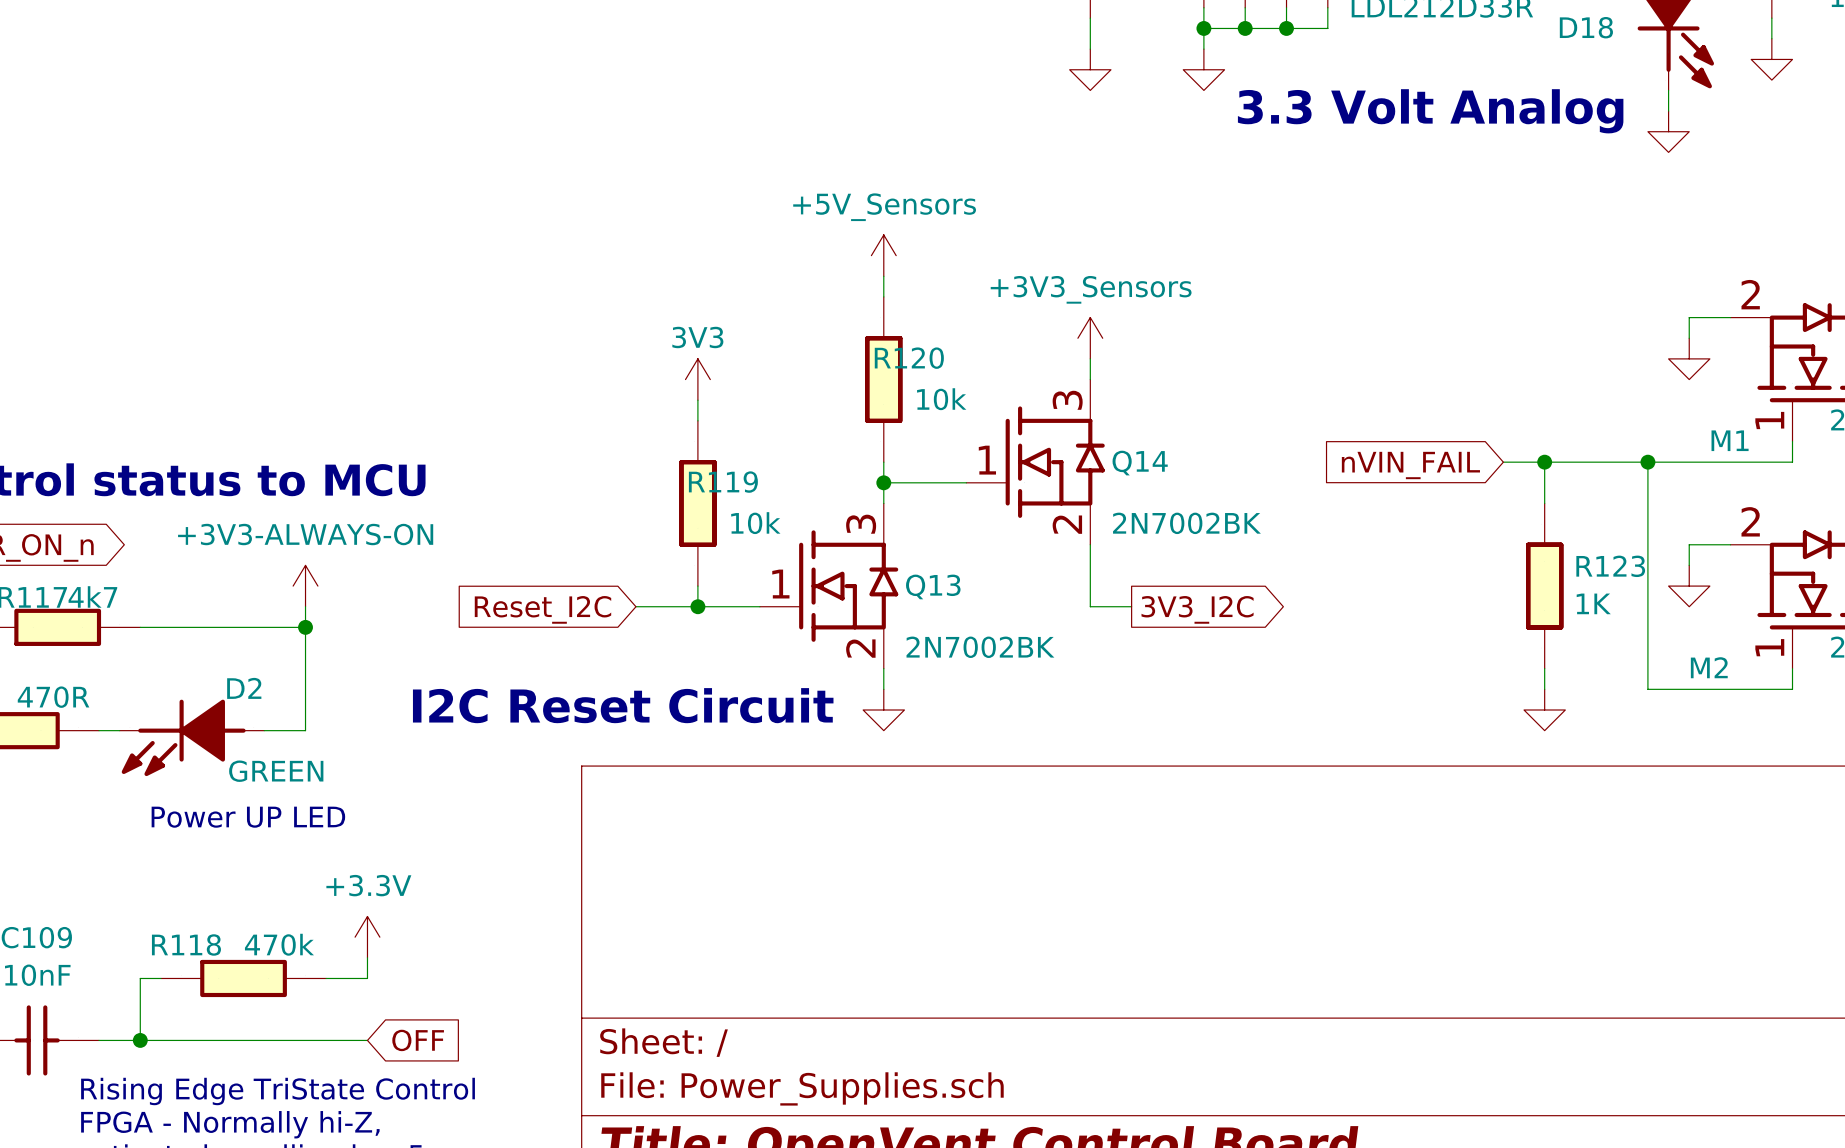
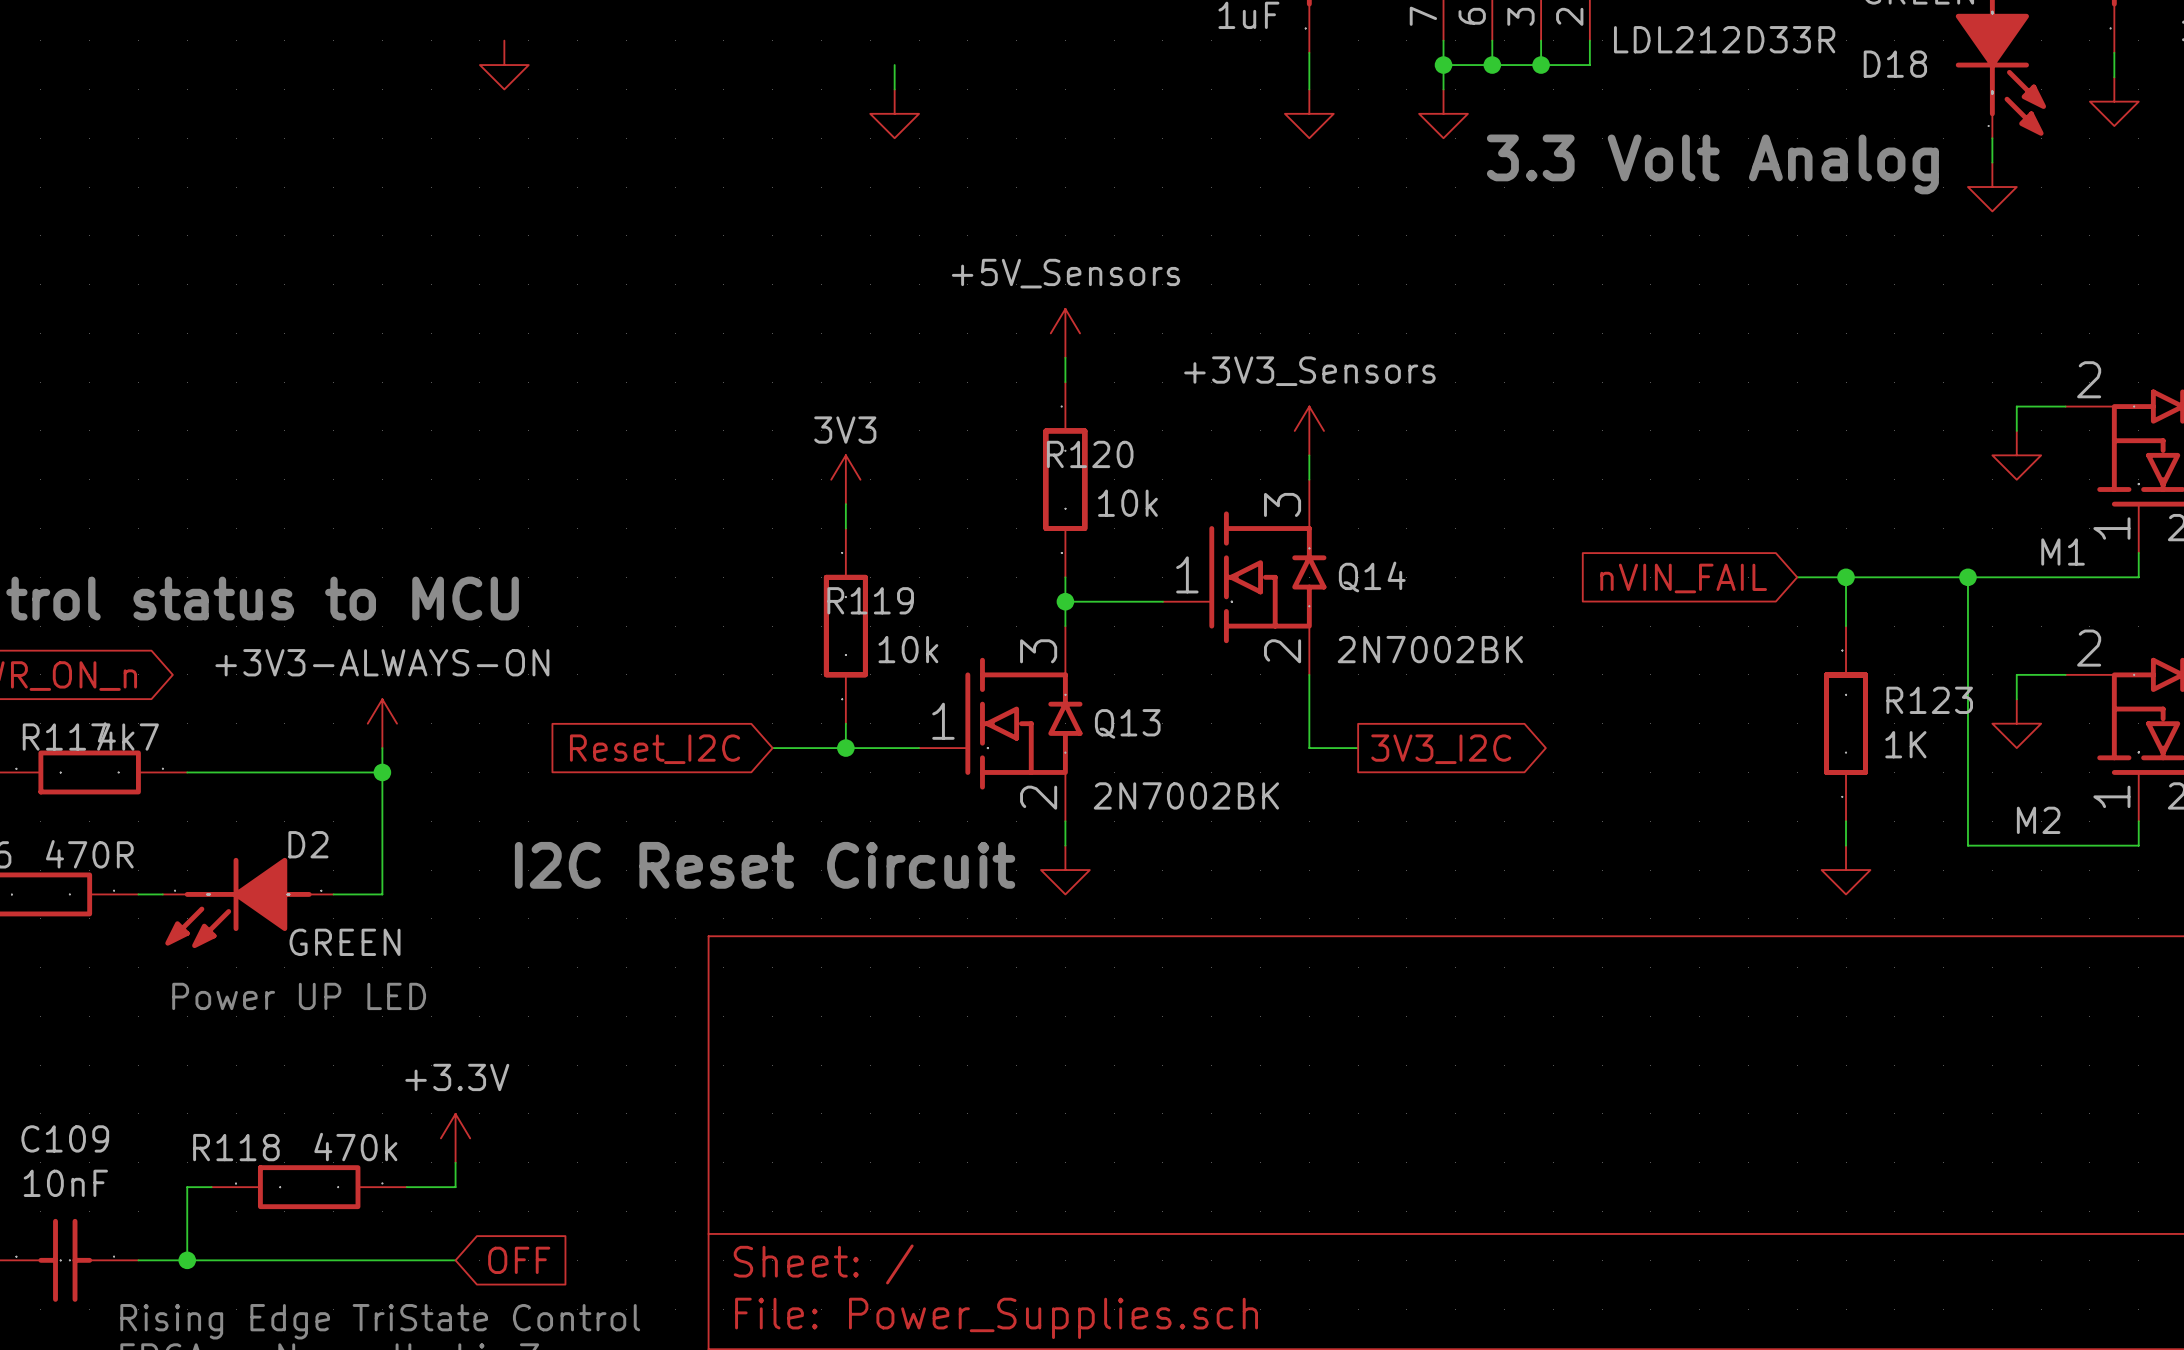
power symbol: none -> (504, 65)
wire: none -> (894, 65) (894, 89)
power symbol: none -> (894, 113)

